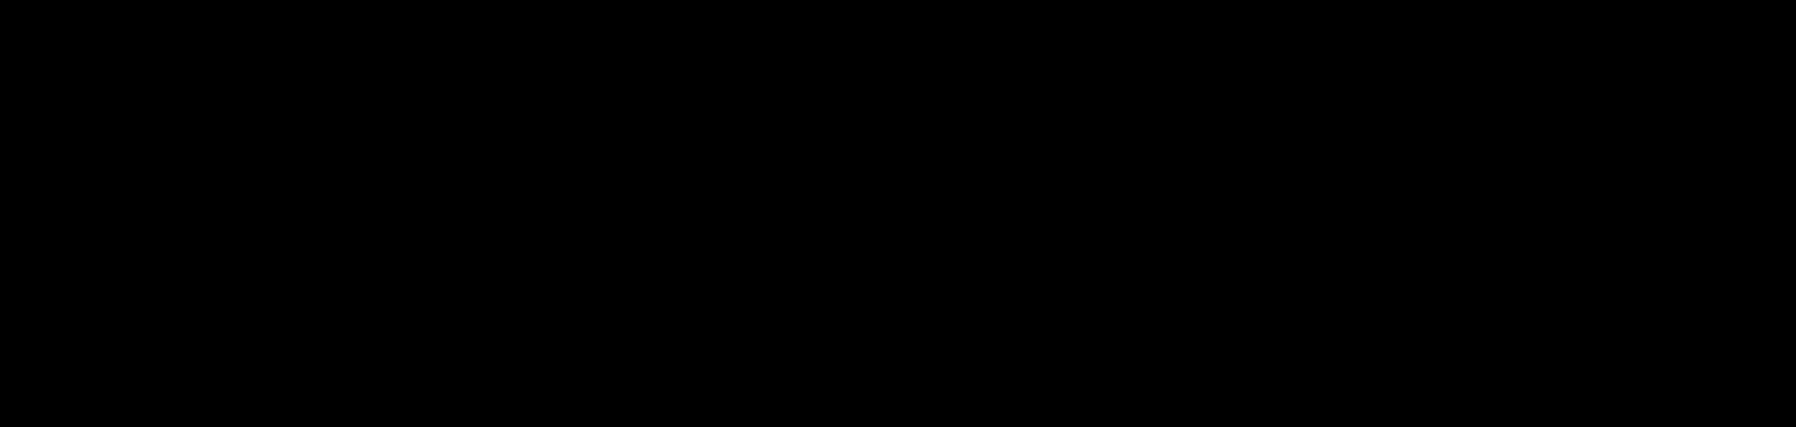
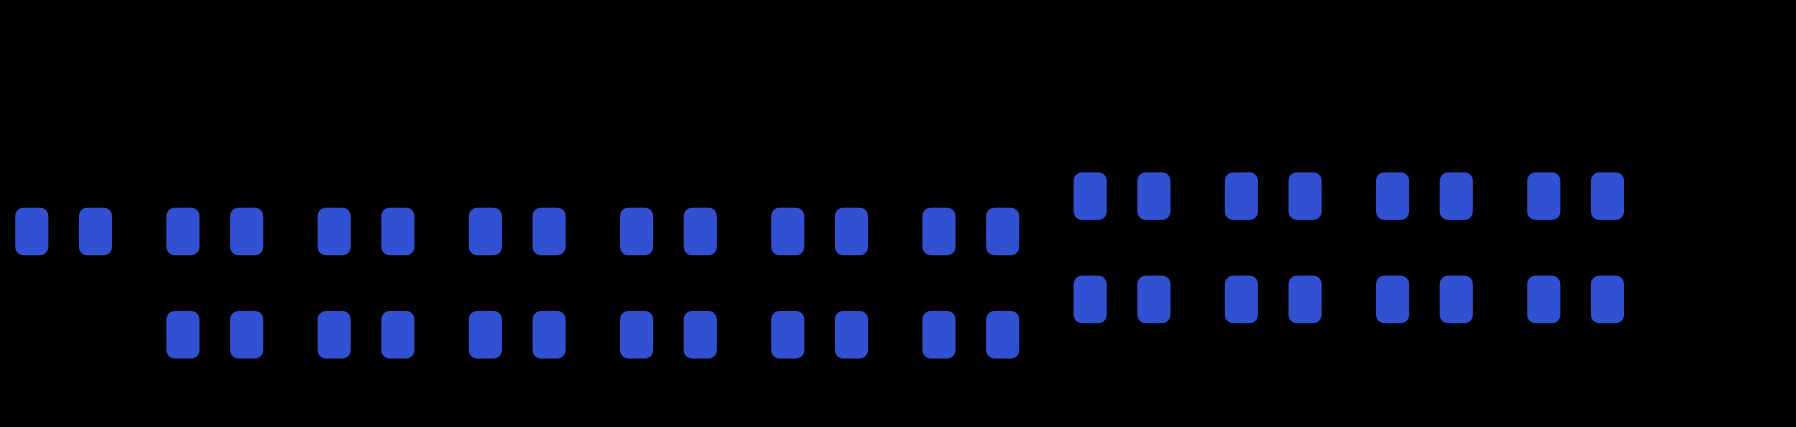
part: none -> (1122, 196)
part: none -> (1273, 196)
part: none -> (1424, 196)
part: none -> (1575, 196)
part: none -> (63, 231)
part: none -> (214, 231)
part: none -> (366, 231)
part: none -> (517, 231)
part: none -> (668, 231)
part: none -> (819, 231)
part: none -> (970, 231)
part: none -> (1122, 299)
part: none -> (1273, 299)
part: none -> (1424, 299)
part: none -> (1575, 299)
part: none -> (214, 334)
part: none -> (366, 334)
part: none -> (517, 334)
part: none -> (668, 334)
part: none -> (819, 334)
part: none -> (970, 334)

